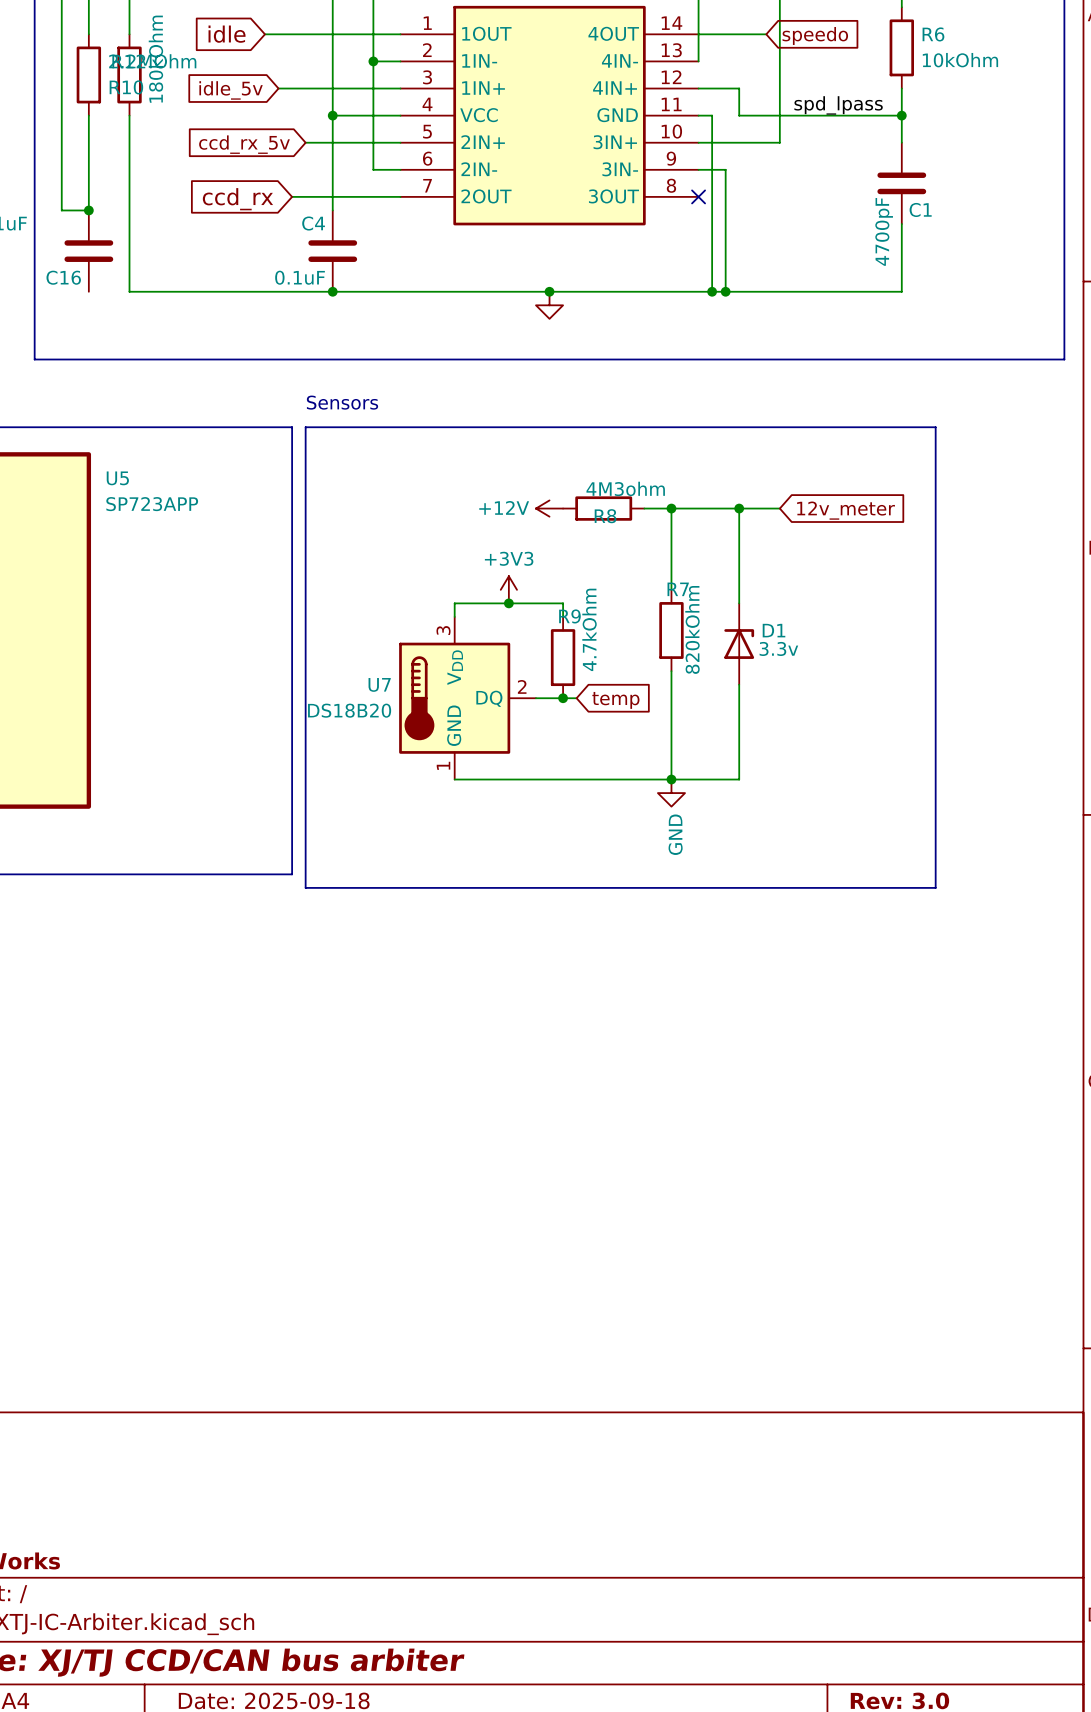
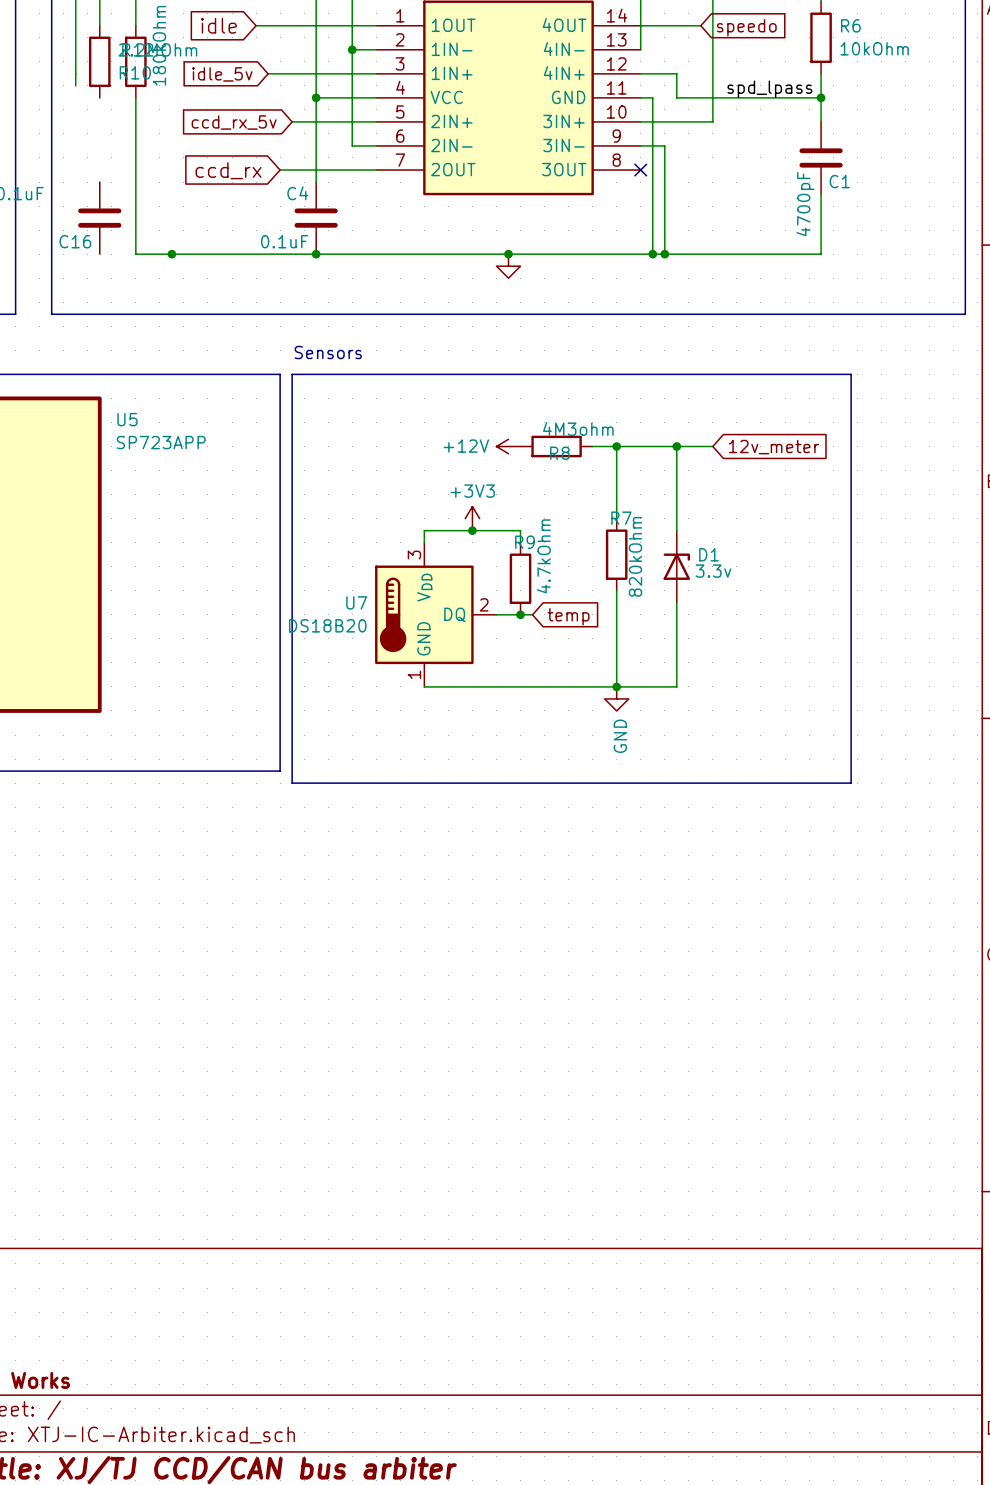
wire: (61, 102) (61, 210) (88, 210) (88, 115) -> none
junction: (88, 210) -> none
junction: none -> (171, 254)

